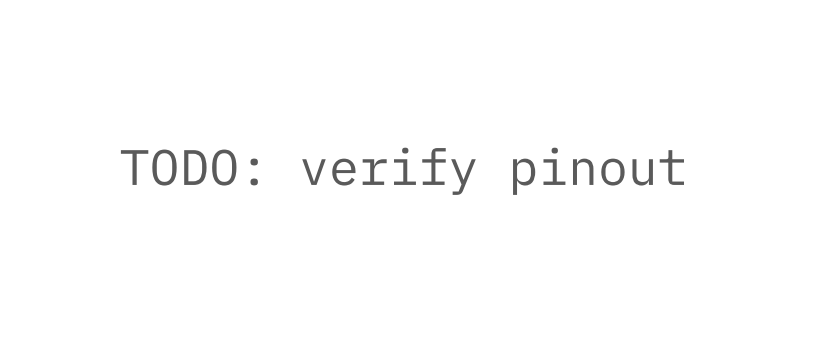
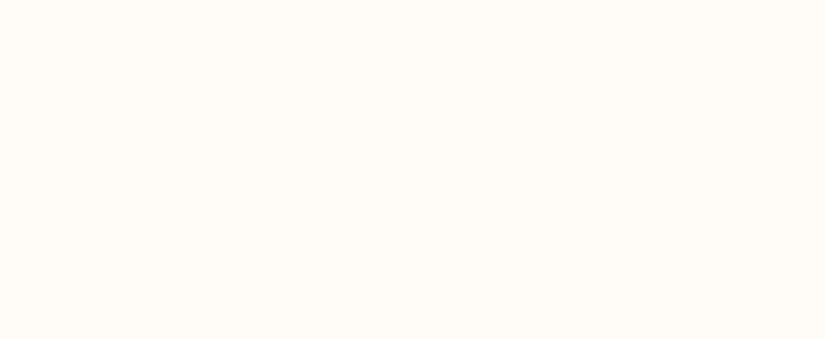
text: TODO: verify pinout (402, 171) -> none

